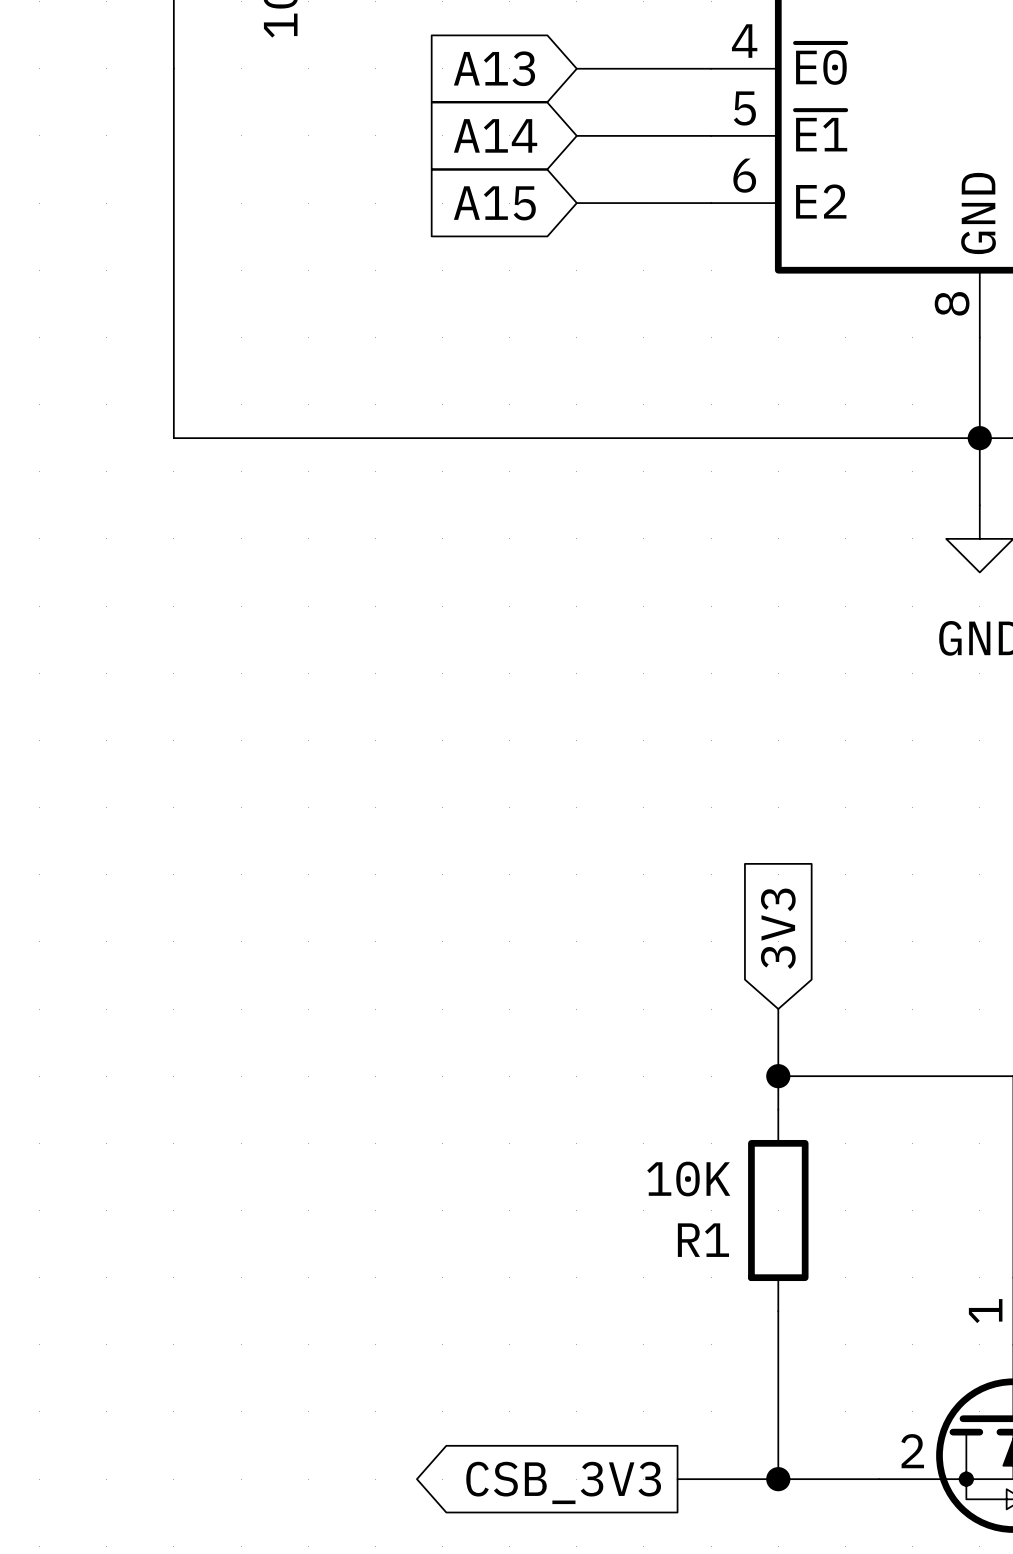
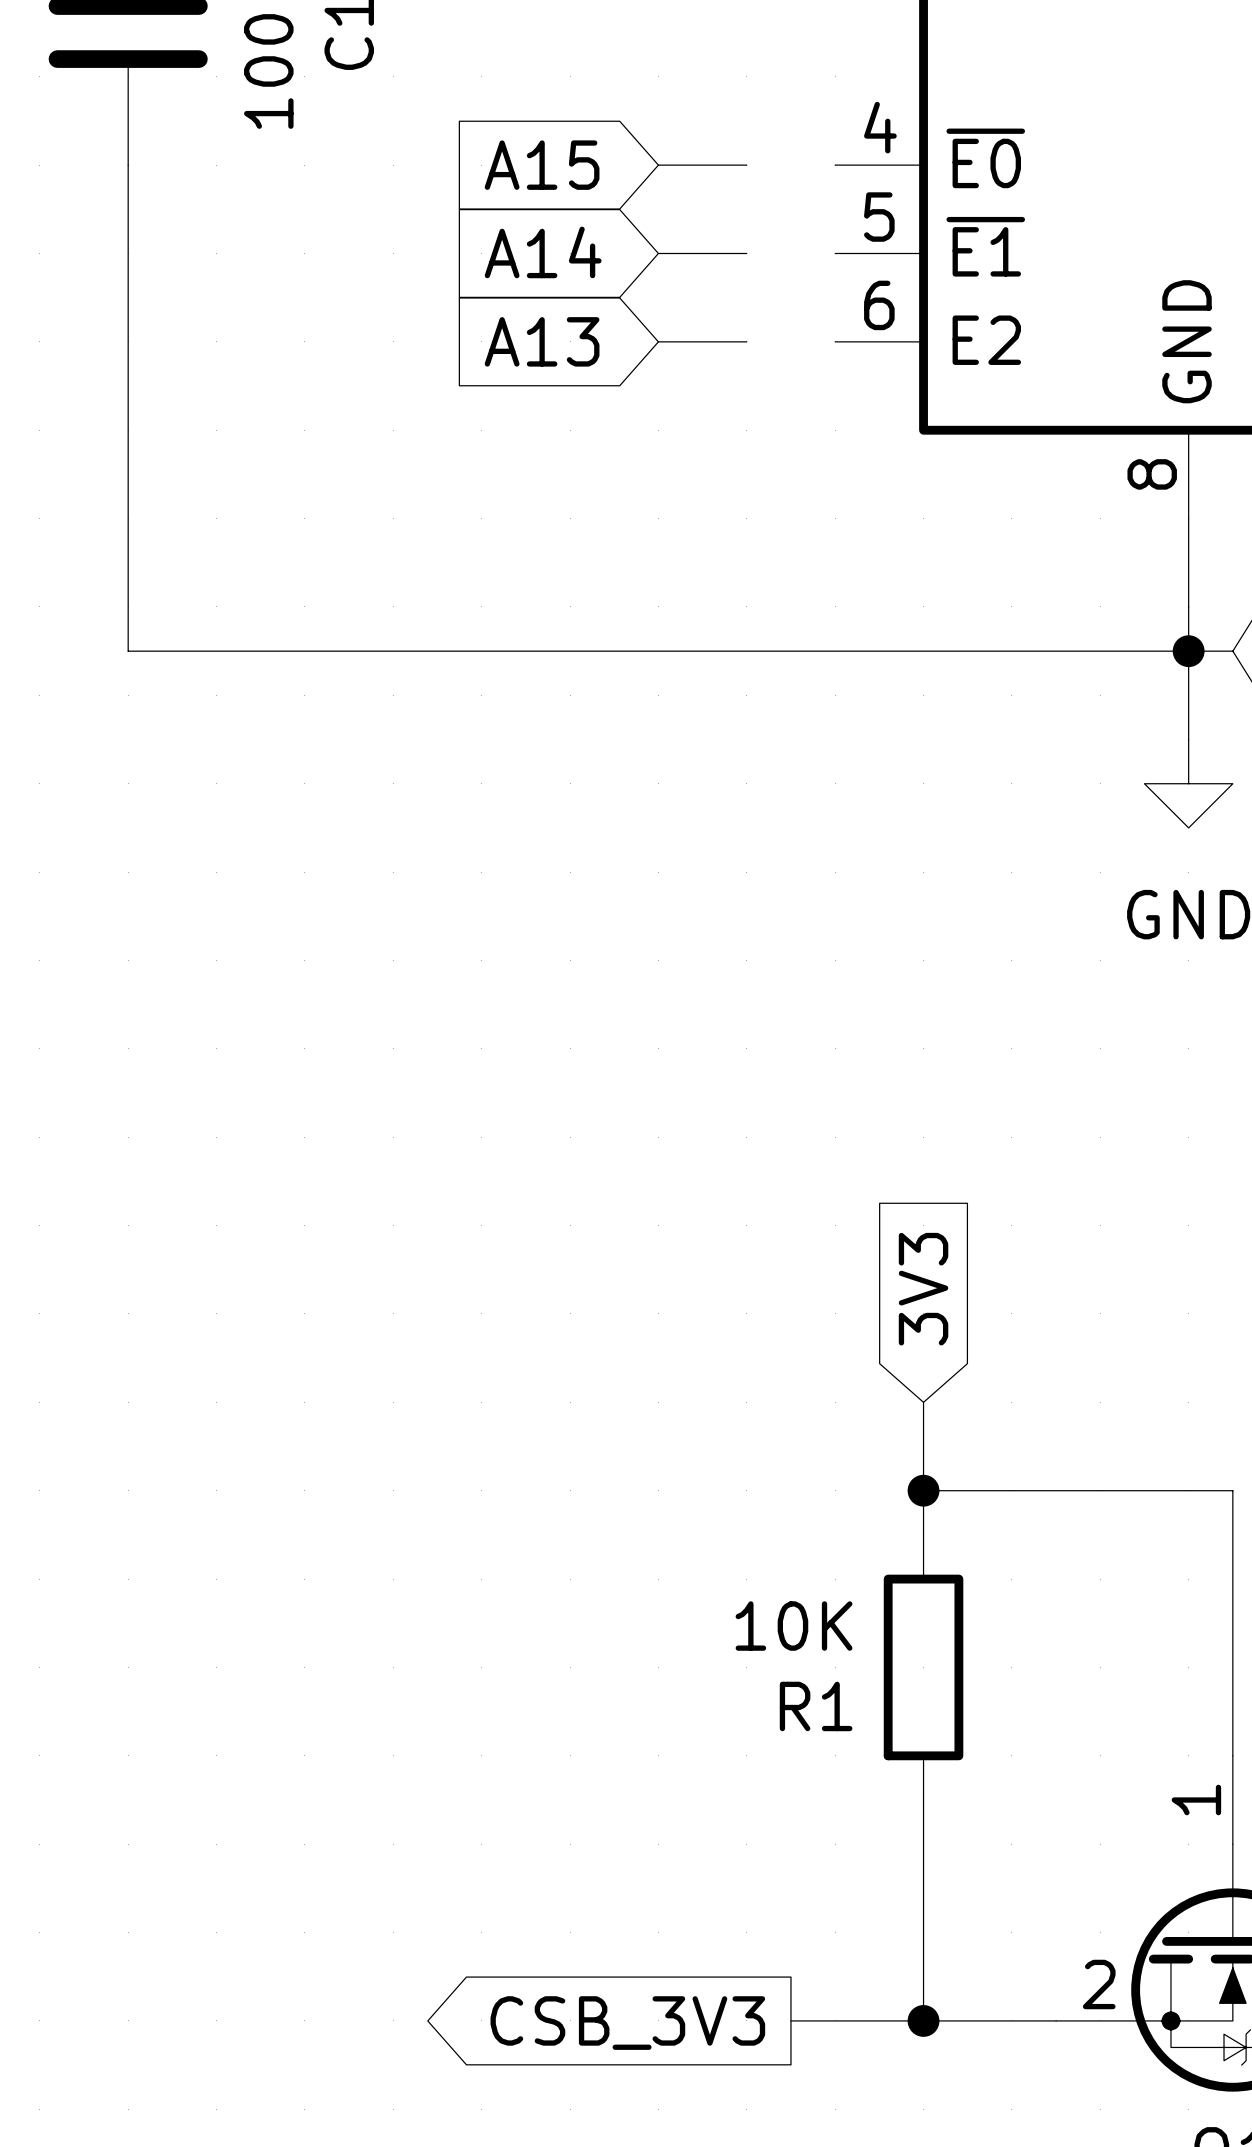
global label: A13 (494, 68) -> A15 (542, 165)
wire: (643, 68) (711, 68) -> none
wire: (643, 135) (711, 135) -> none
global label: A15 (494, 203) -> A13 (542, 341)
wire: (643, 203) (711, 203) -> none

